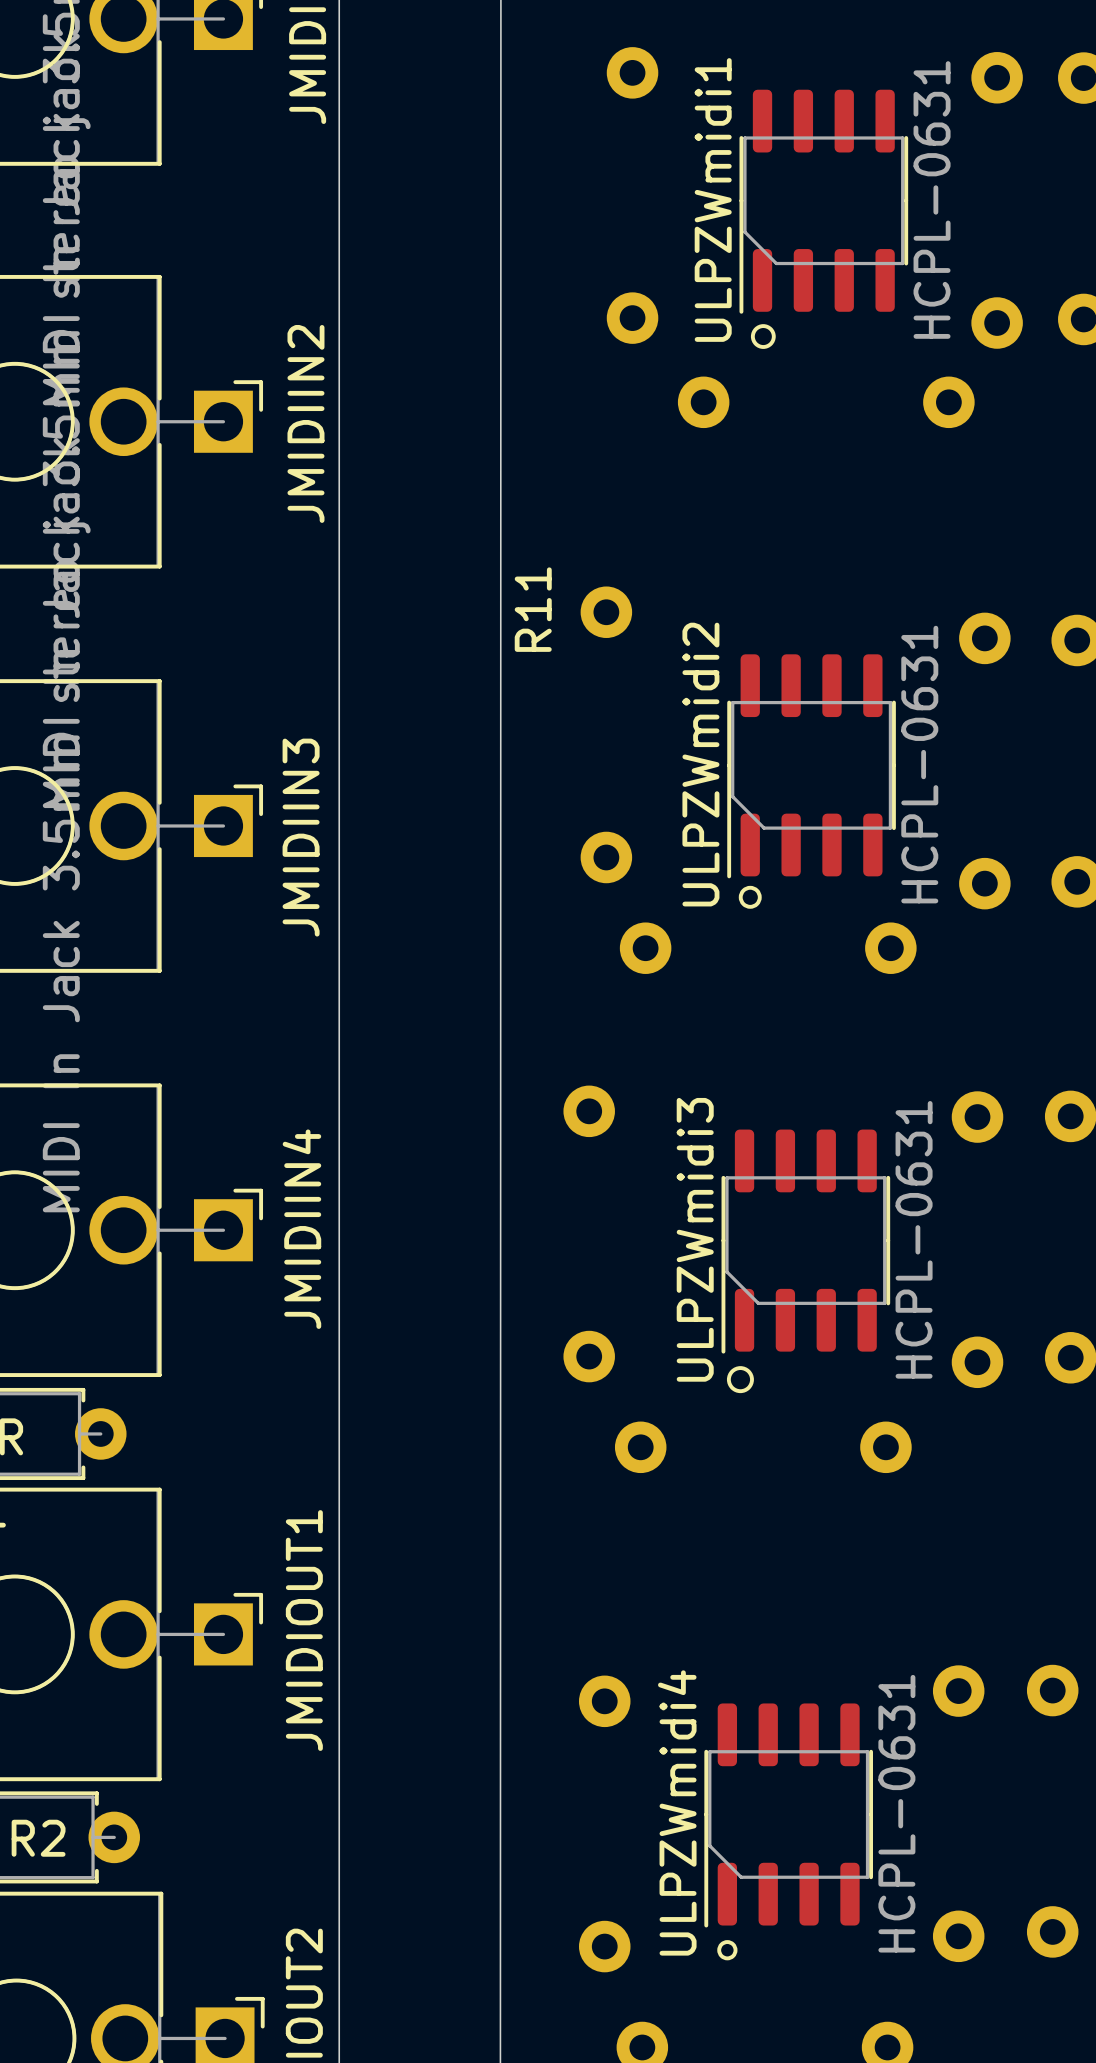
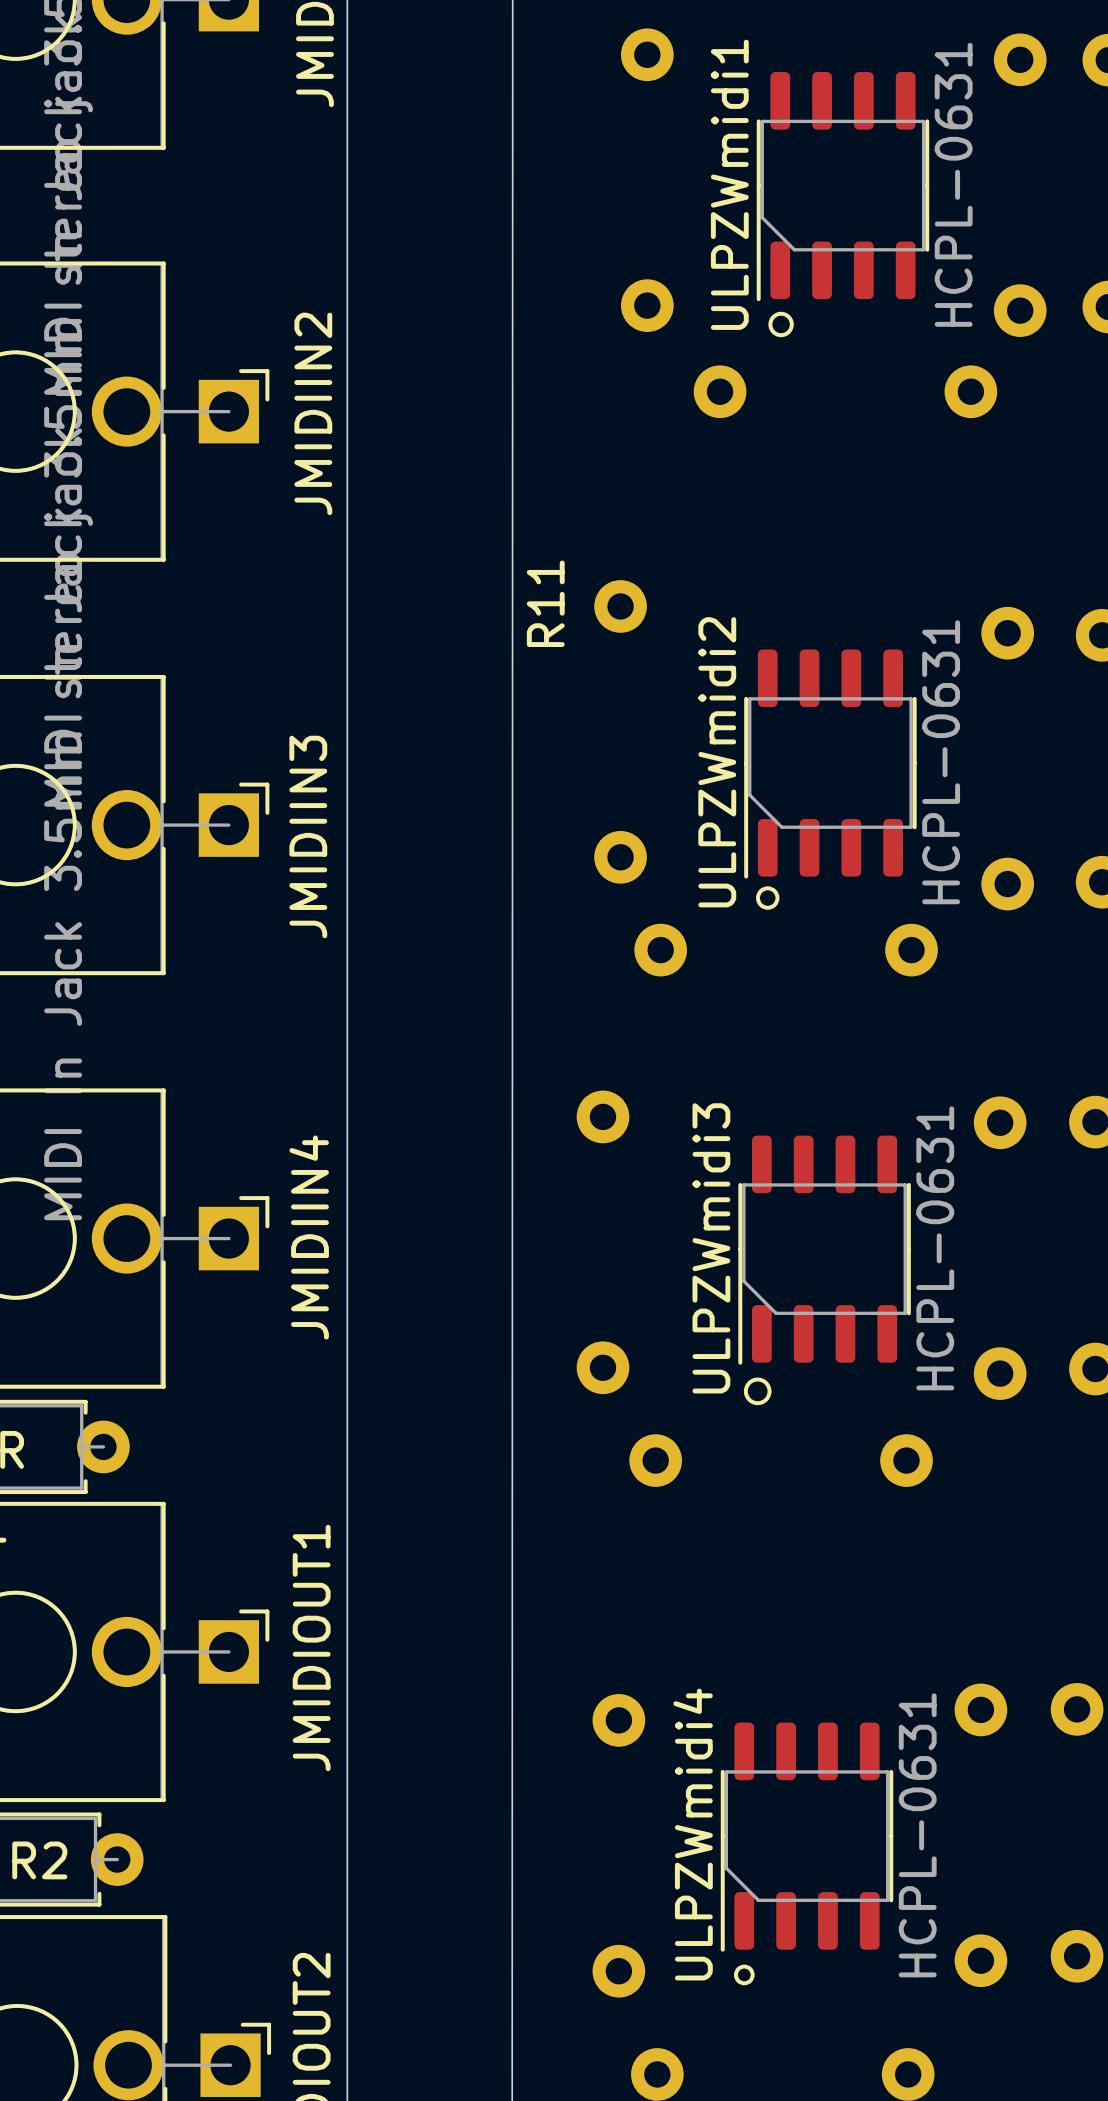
ULPZWmidi1 footprint: [739, 89, 909, 314] -> [756, 72, 930, 302]
ULPZWmidi2 footprint: [727, 654, 896, 879] -> [744, 649, 917, 879]
ULPZWmidi3 footprint: [721, 1129, 891, 1354] -> [738, 1135, 911, 1365]
ULPZWmidi4 footprint: [704, 1703, 873, 1928] -> [720, 1722, 894, 1952]

